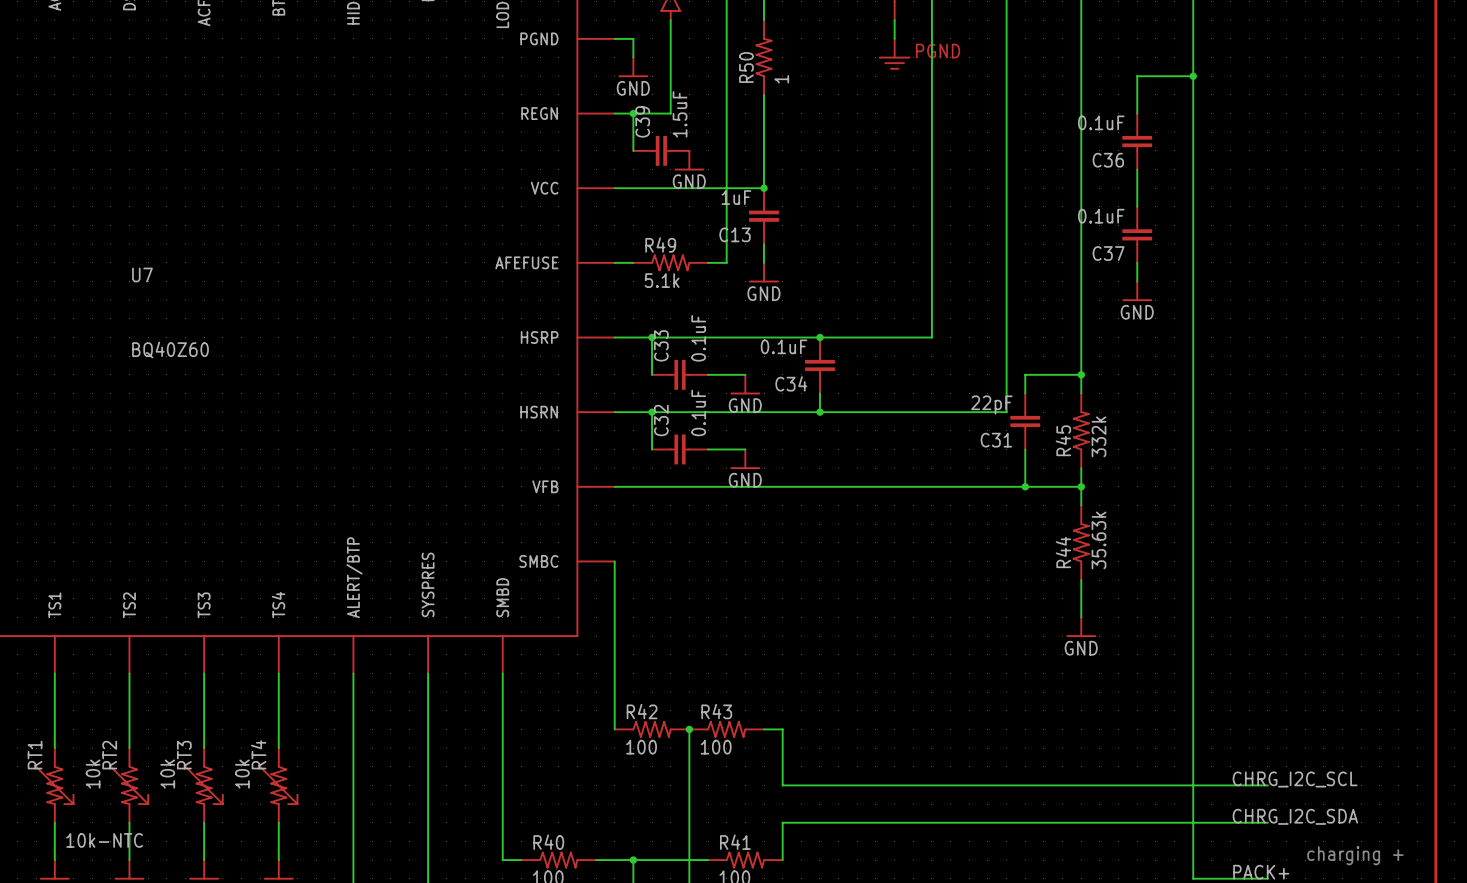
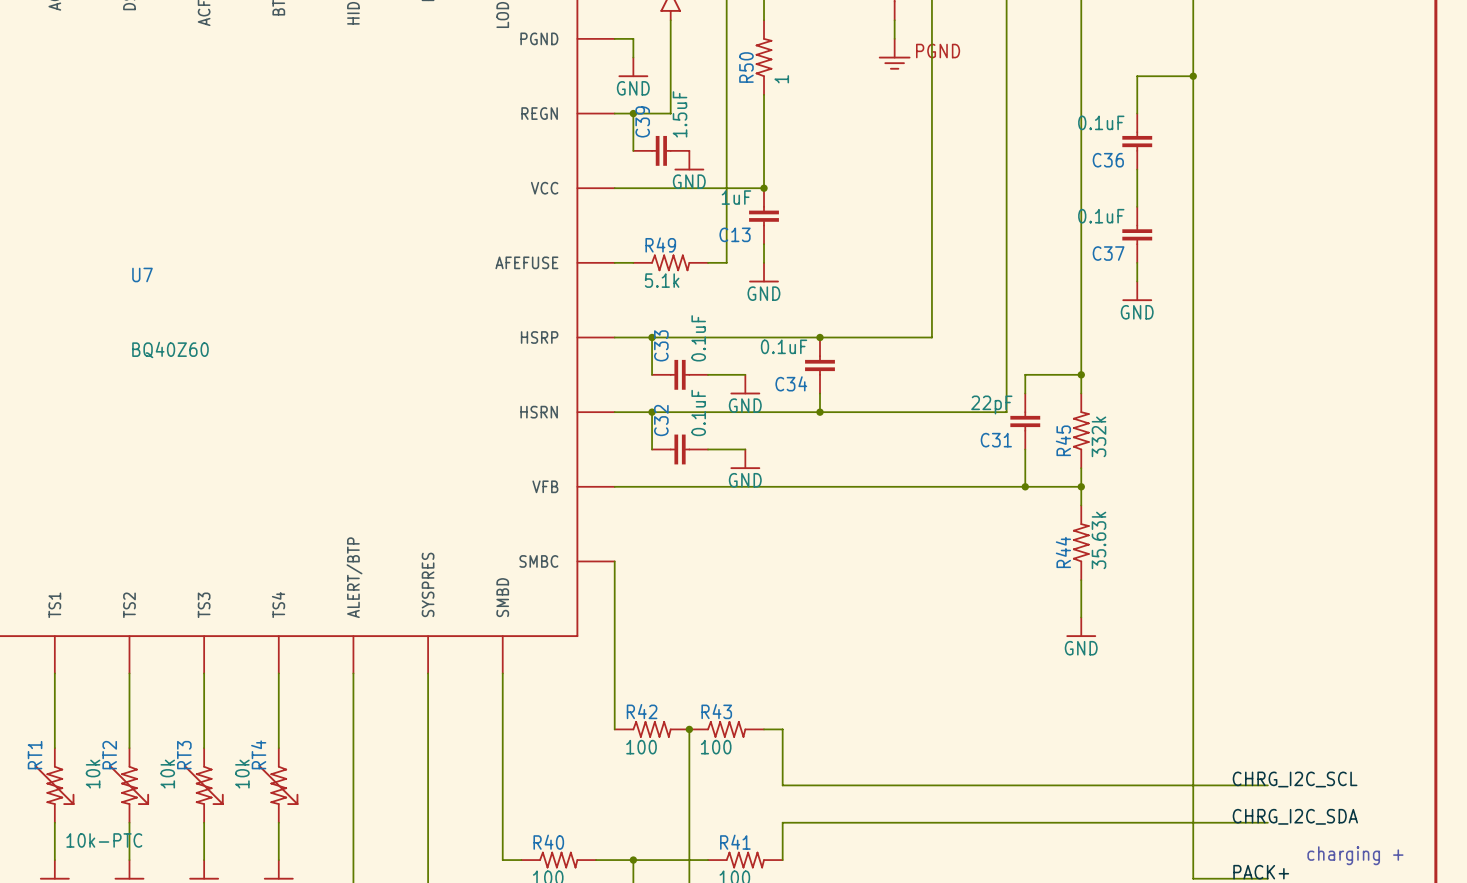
RT1 value: 10k-NTC (104, 840) -> 10k-PTC (104, 840)

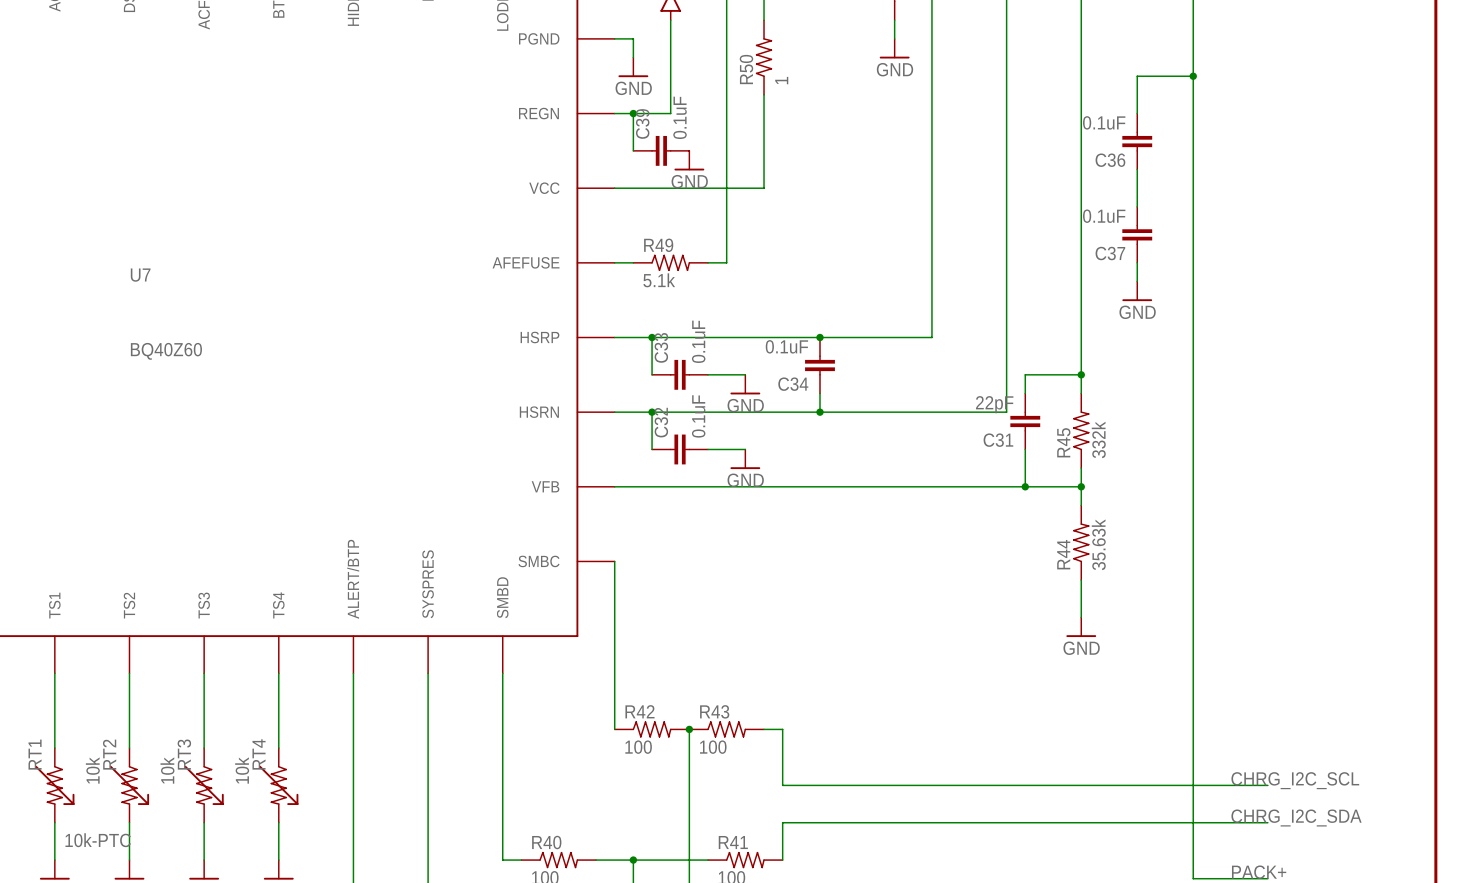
power symbol: PGND (894, 54) -> GND (894, 48)
C39 value: 1.5uF (680, 114) -> 0.1uF (680, 117)
junction: (764, 188) -> none
C13: 1uF (764, 216) -> none
wire: (764, 244) (764, 262) -> none
power symbol: GND (764, 272) -> none
text: charging + (1355, 855) -> none

